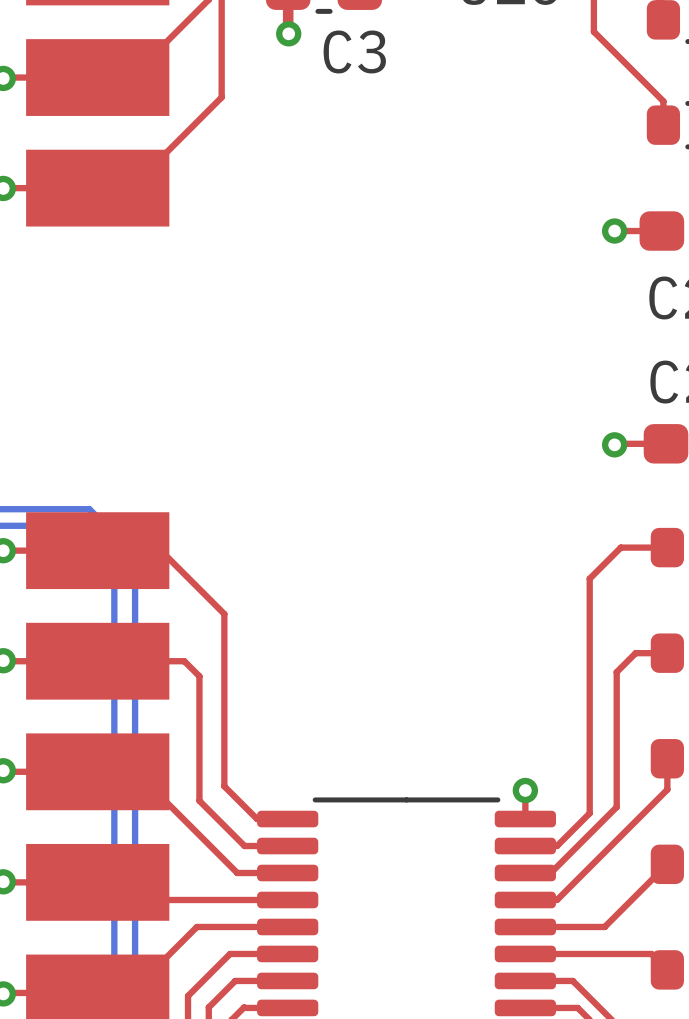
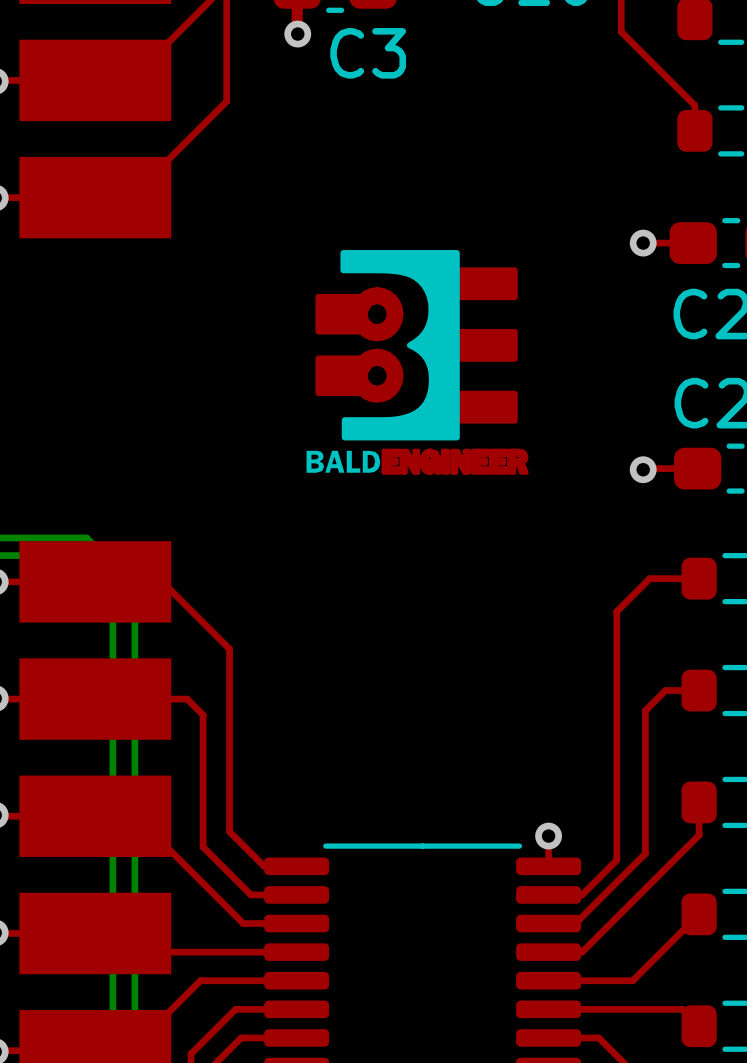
drawing: none -> [306, 250, 529, 476]

